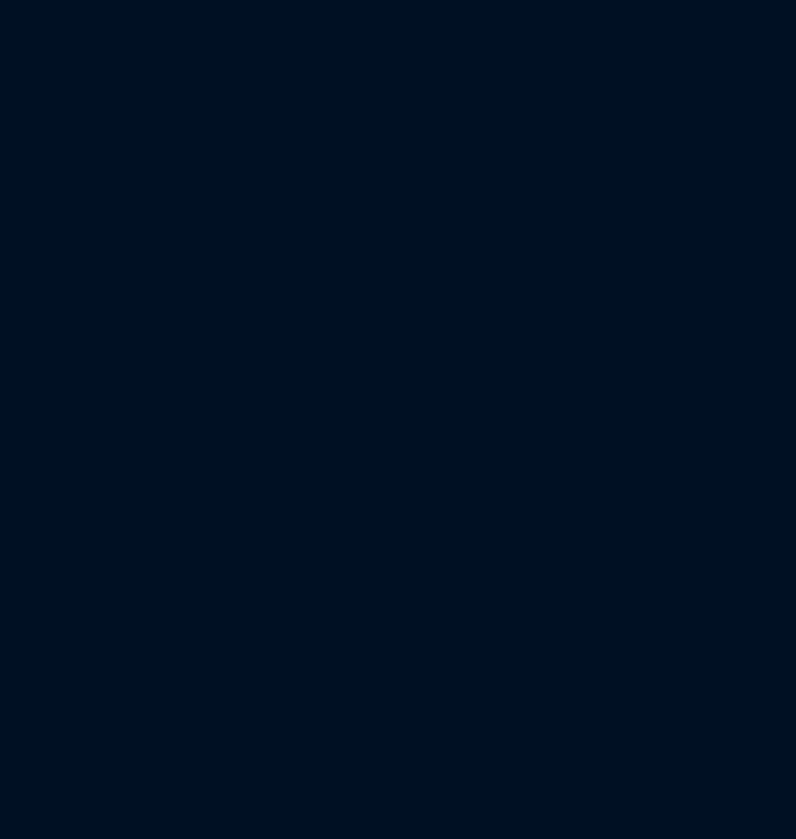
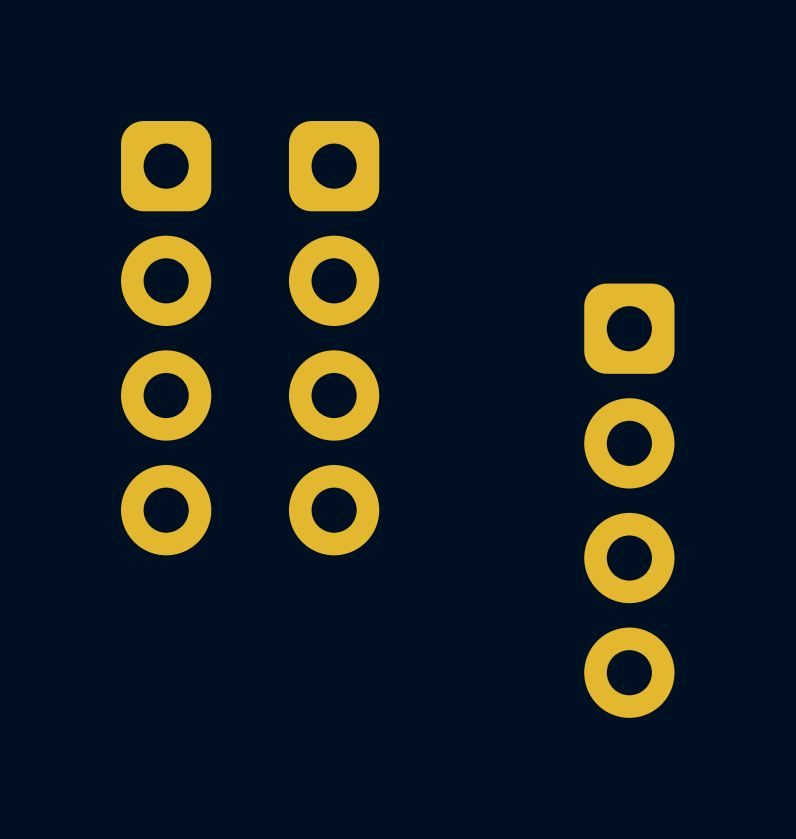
part: none -> (166, 338)
part: none -> (334, 338)
part: none -> (629, 500)

